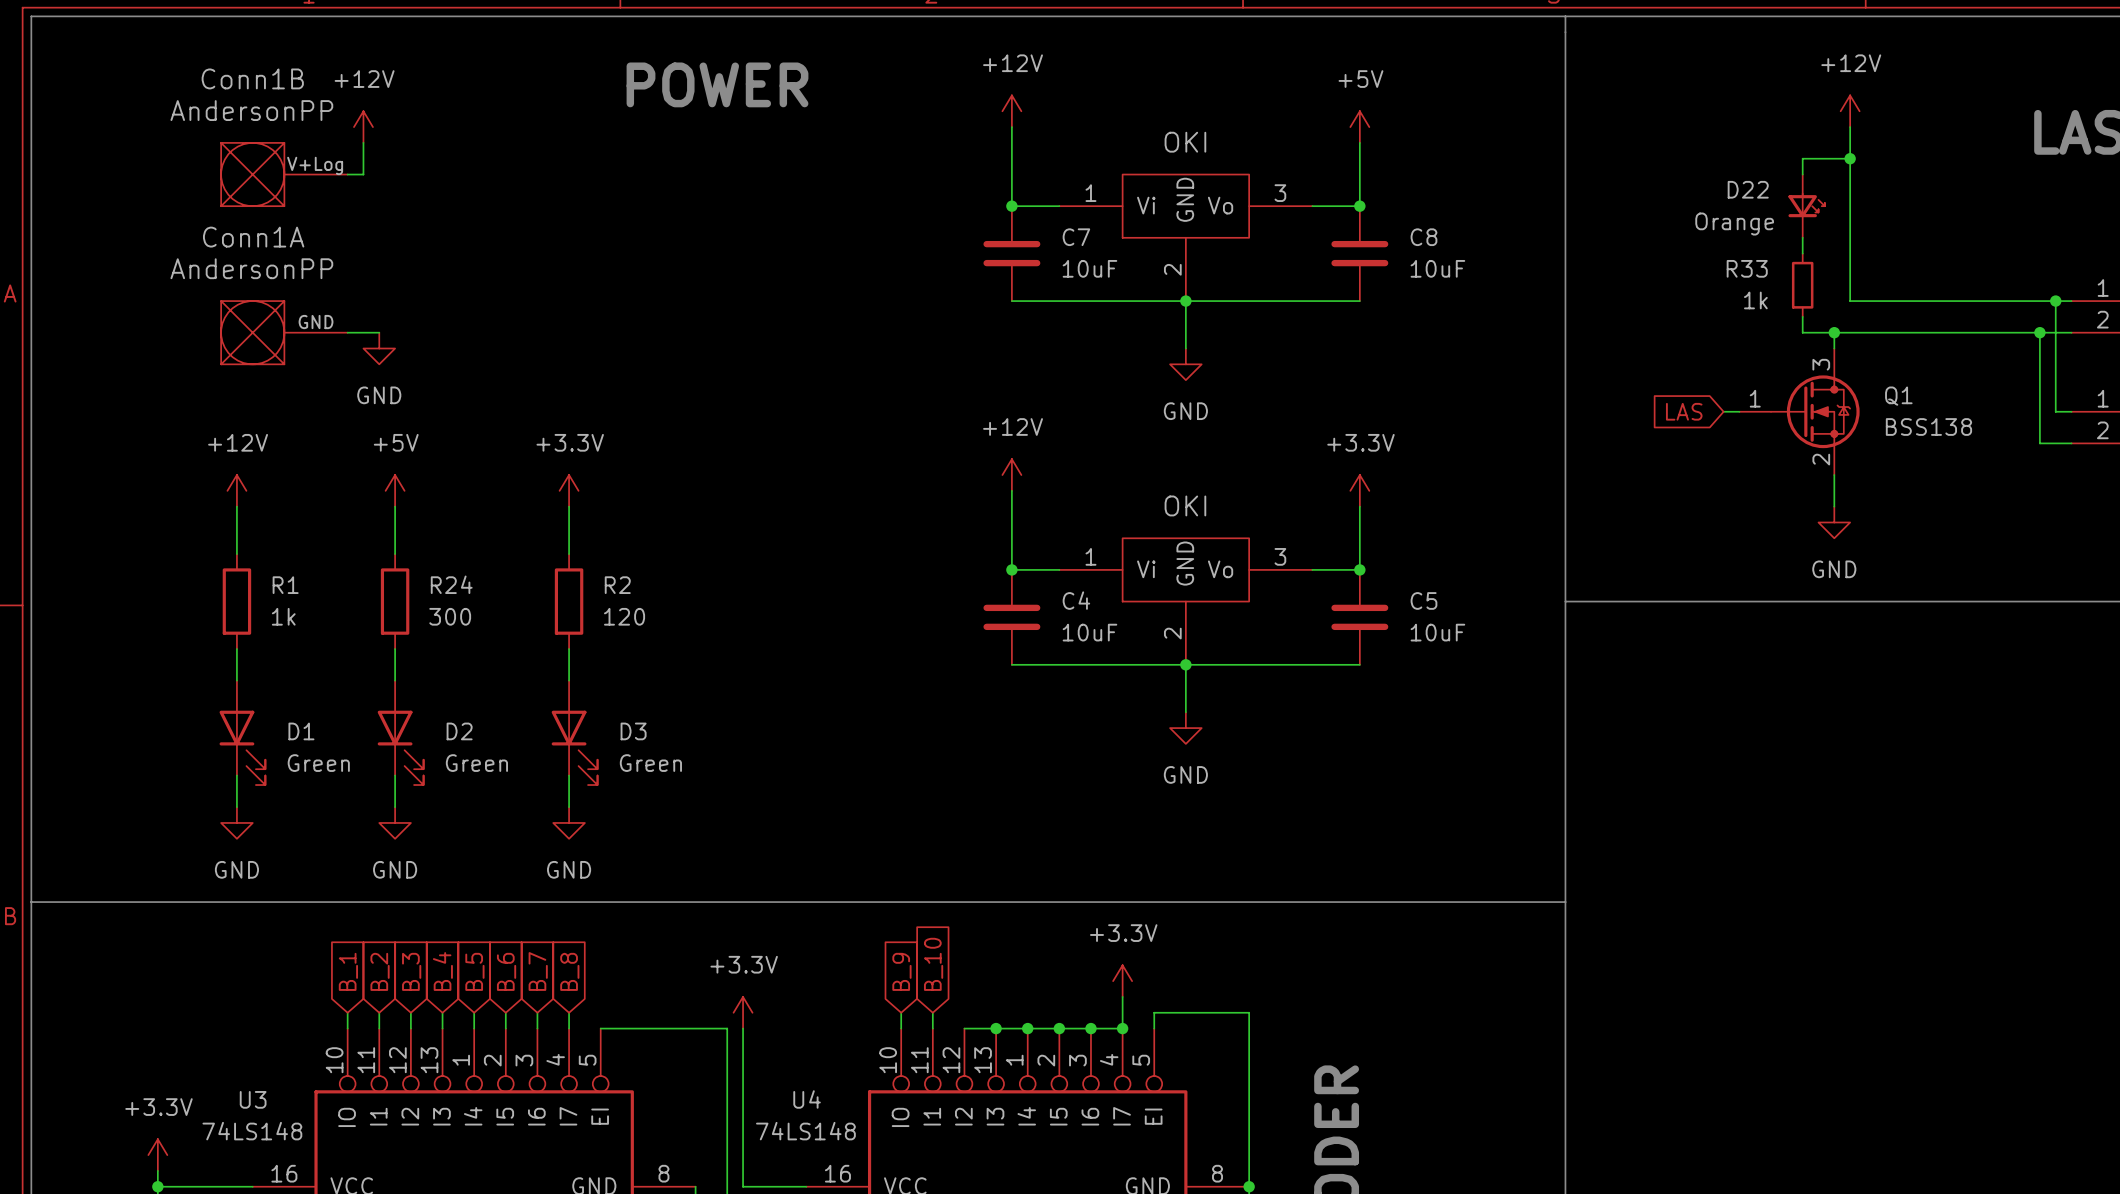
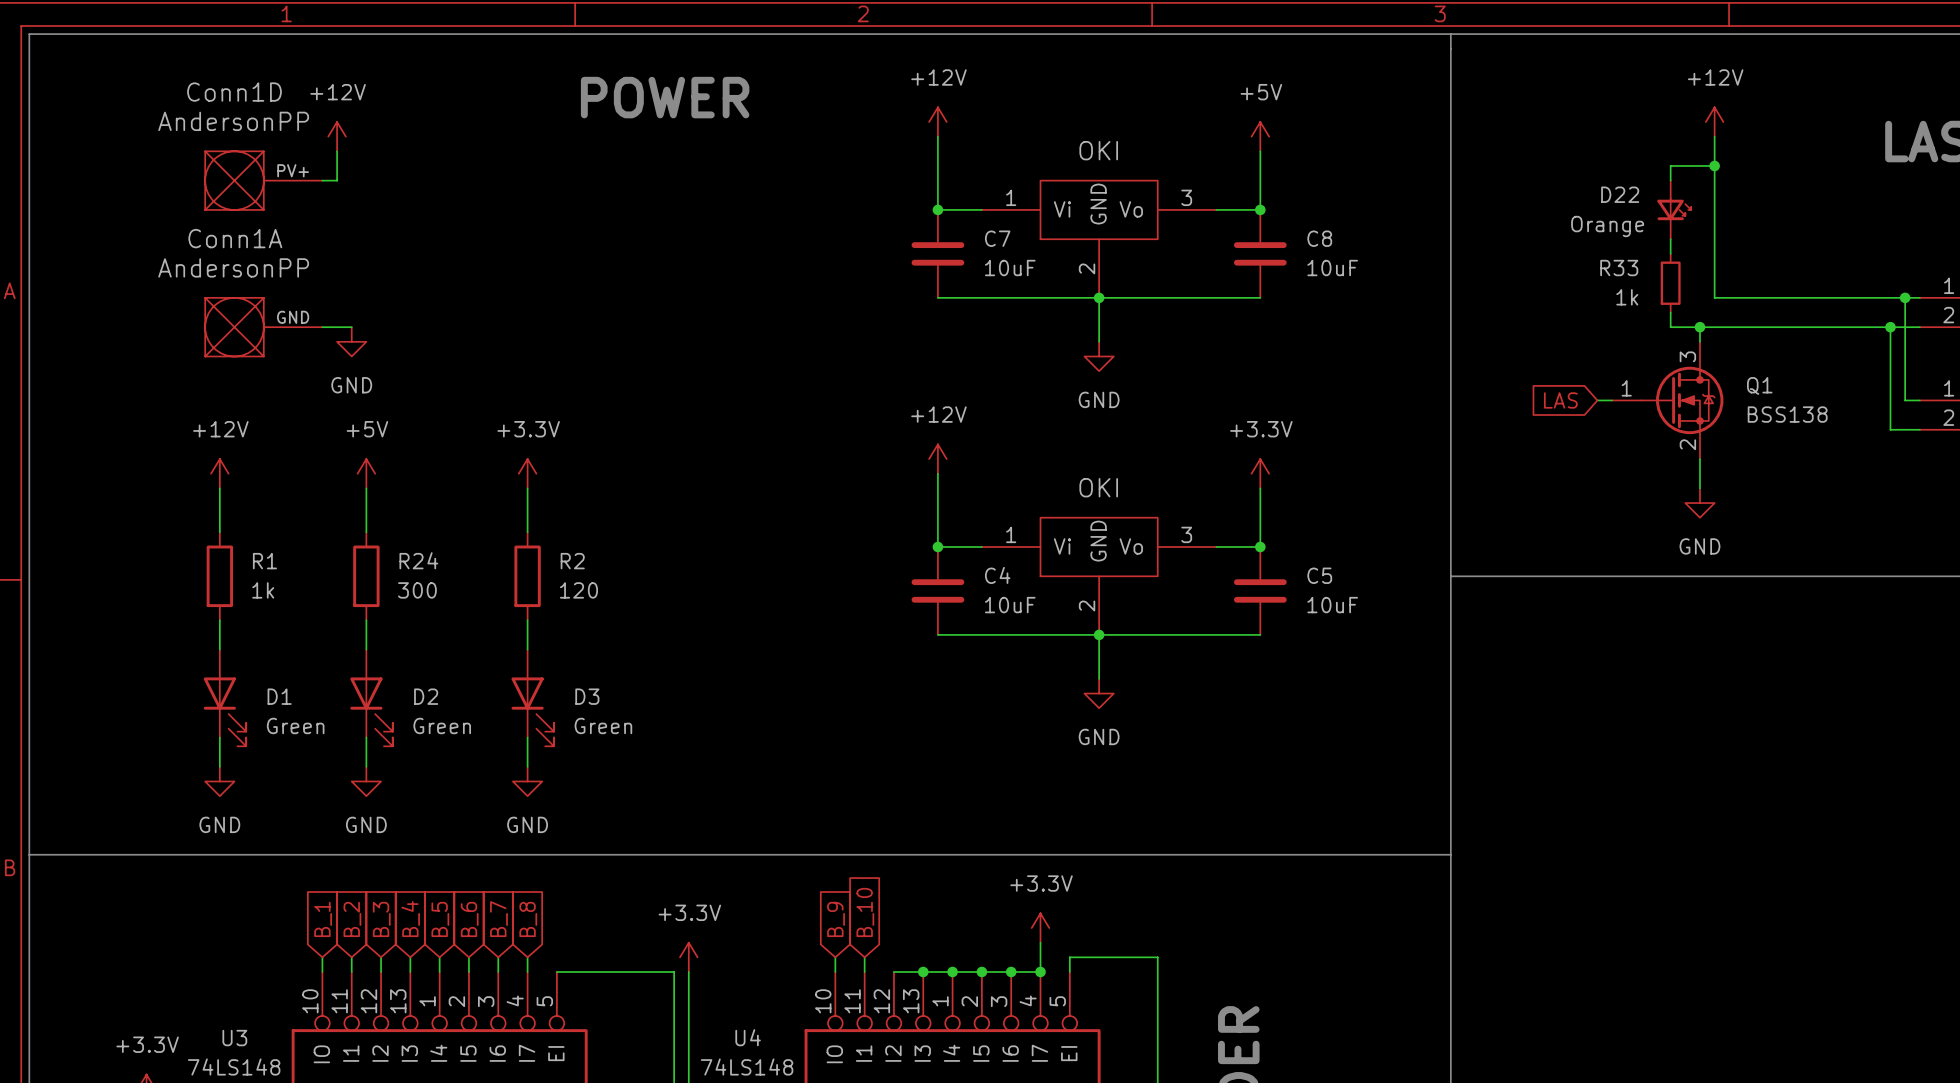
Conn1B name: Conn1B (252, 78) -> Conn1D (234, 92)
Conn1B pin name: V+Log (315, 165) -> PV+ (293, 170)

